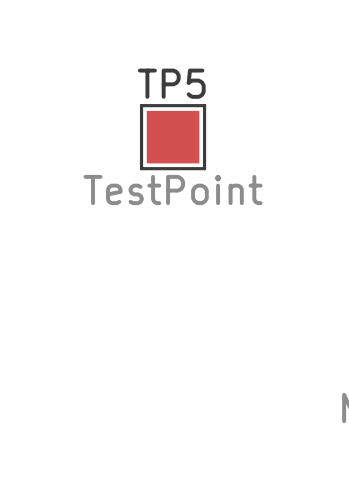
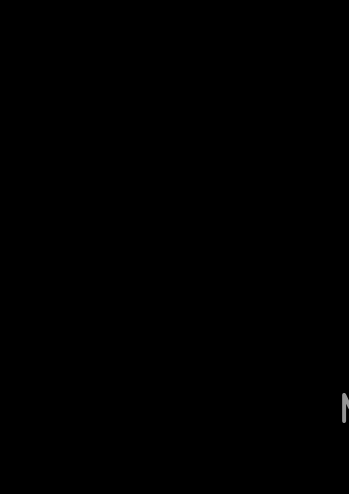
TP5: TestPoint (173, 137) -> none

